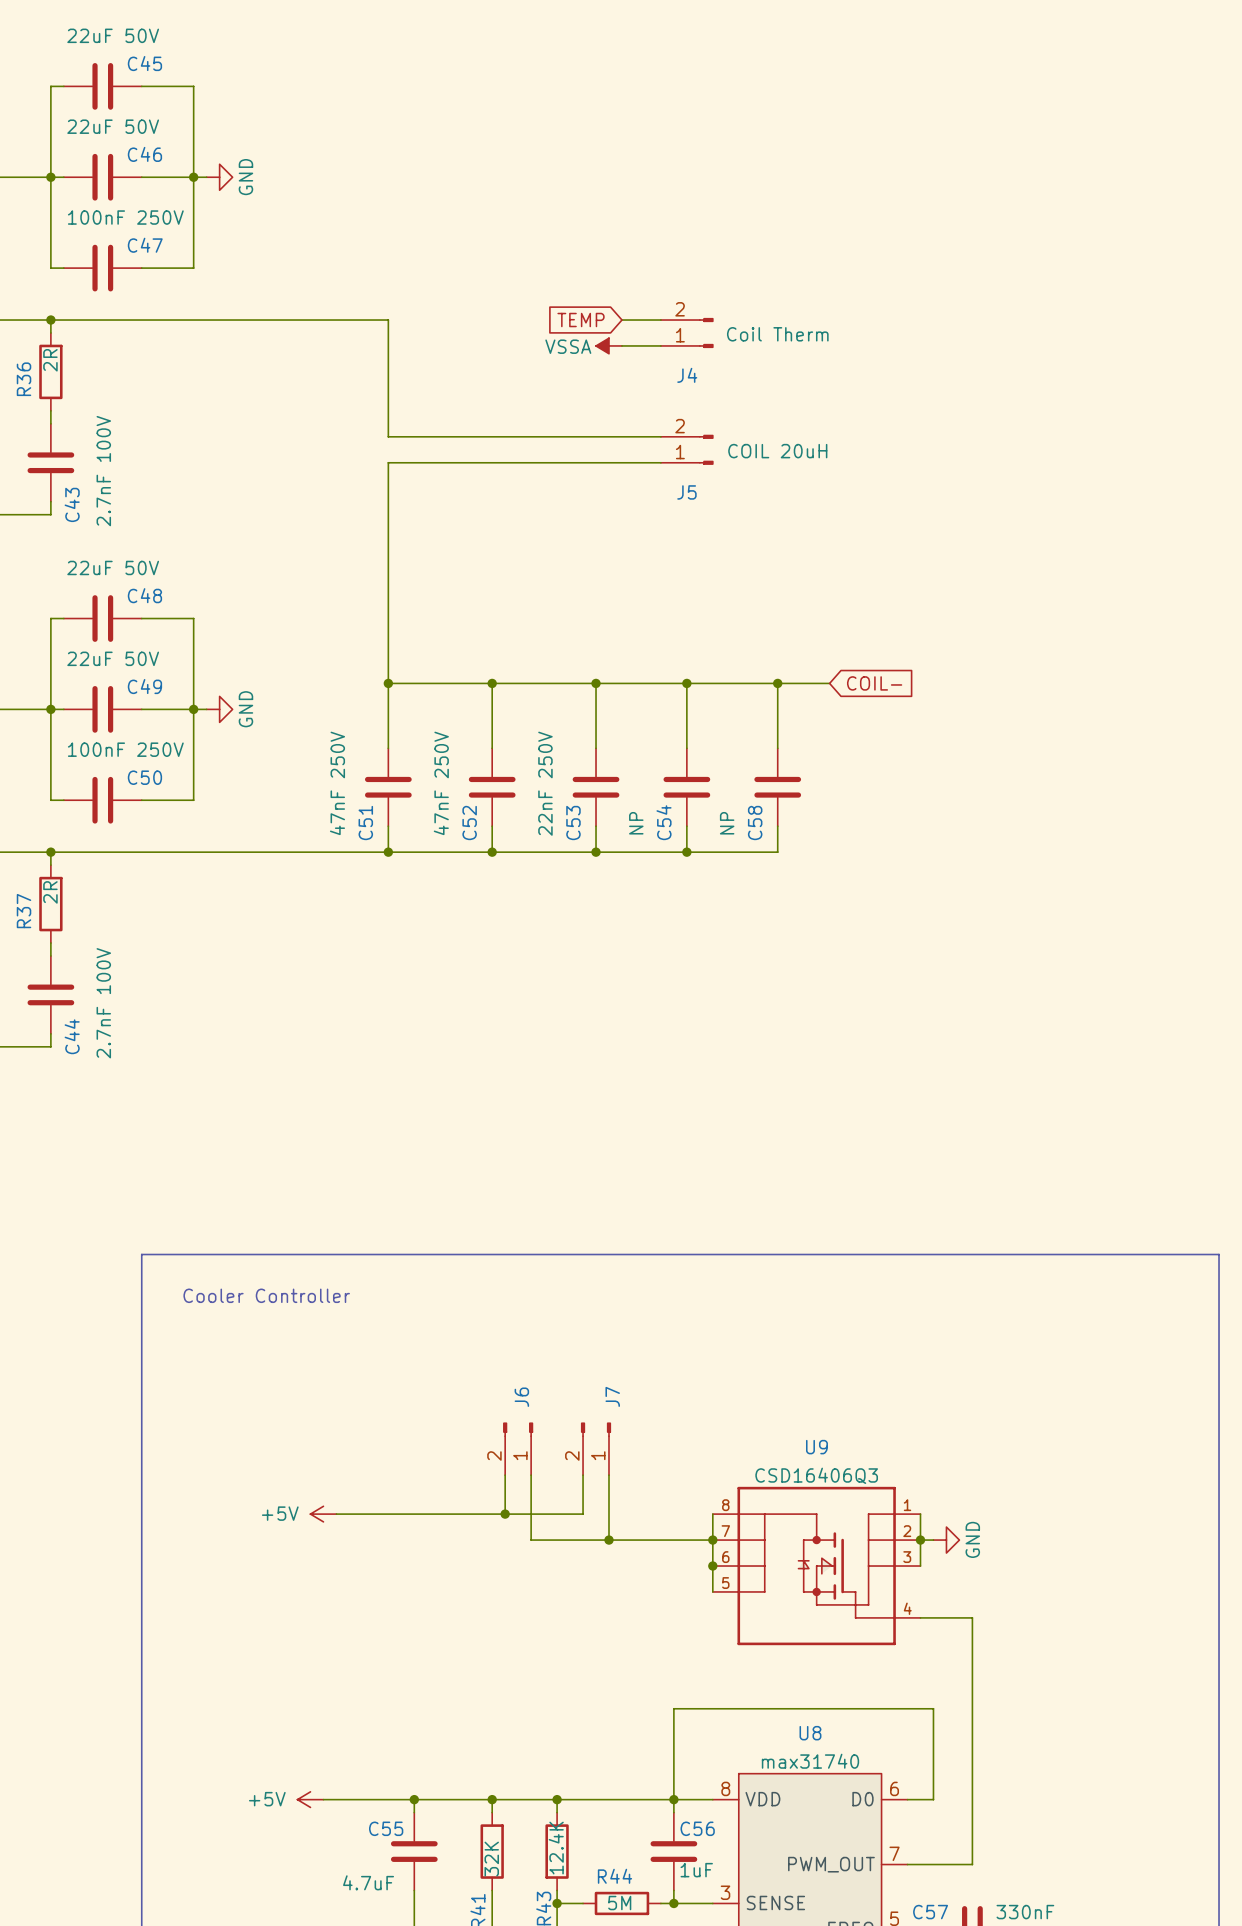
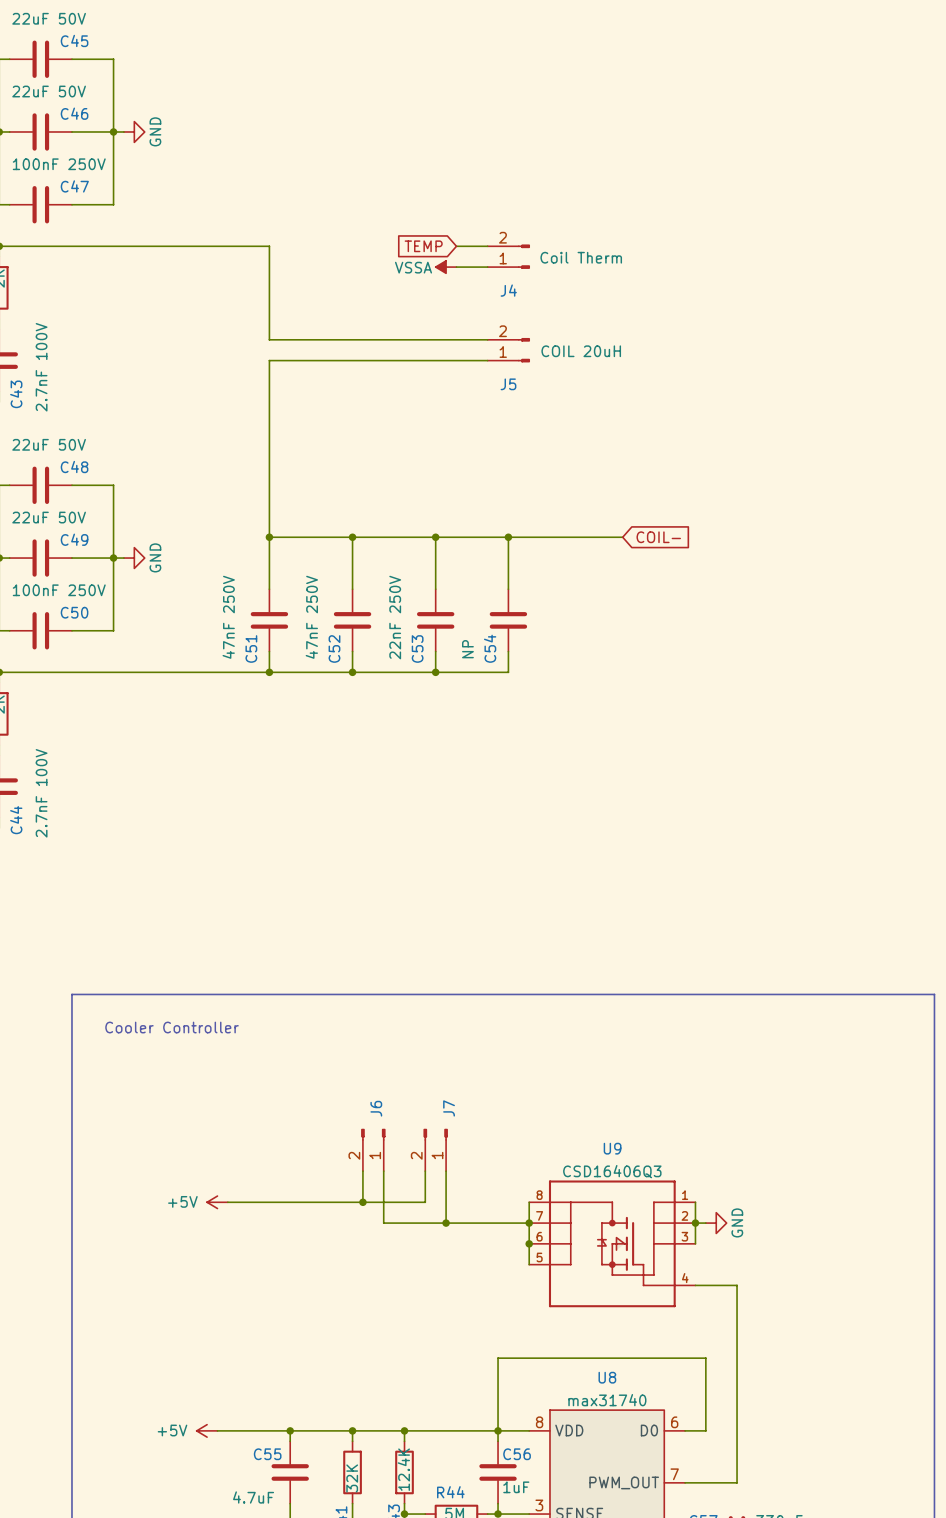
wire: (777, 683) (777, 748) -> none
junction: (777, 683) -> none
C58: NP (777, 787) -> none
wire: (777, 826) (777, 852) (686, 852) -> none
junction: (686, 852) -> none

